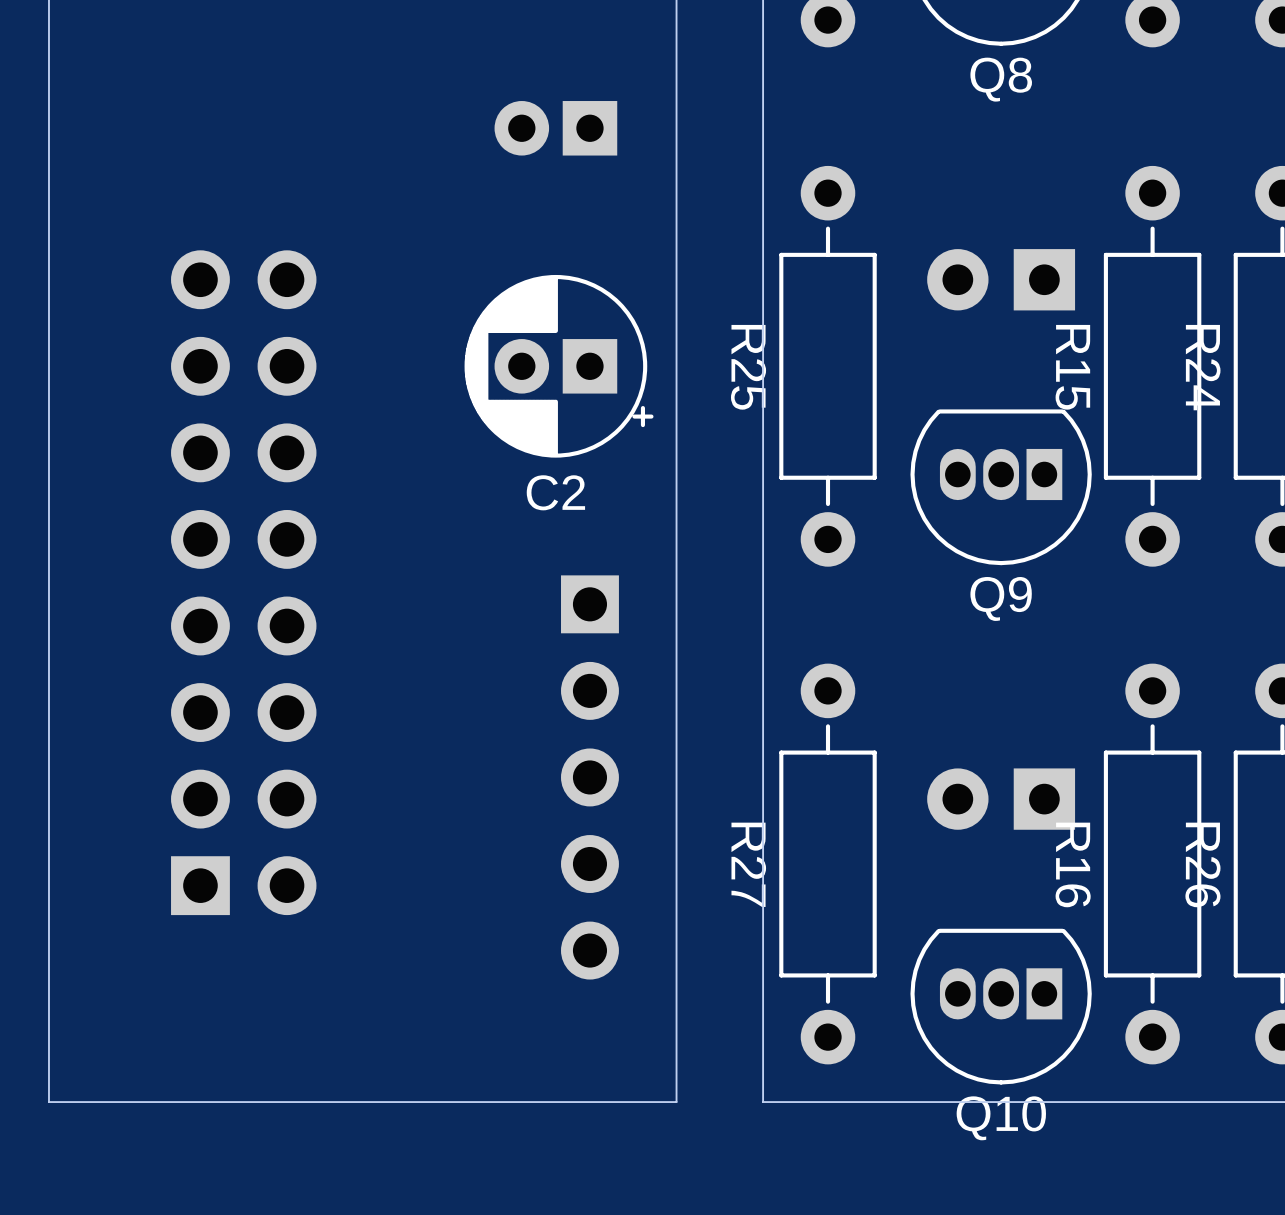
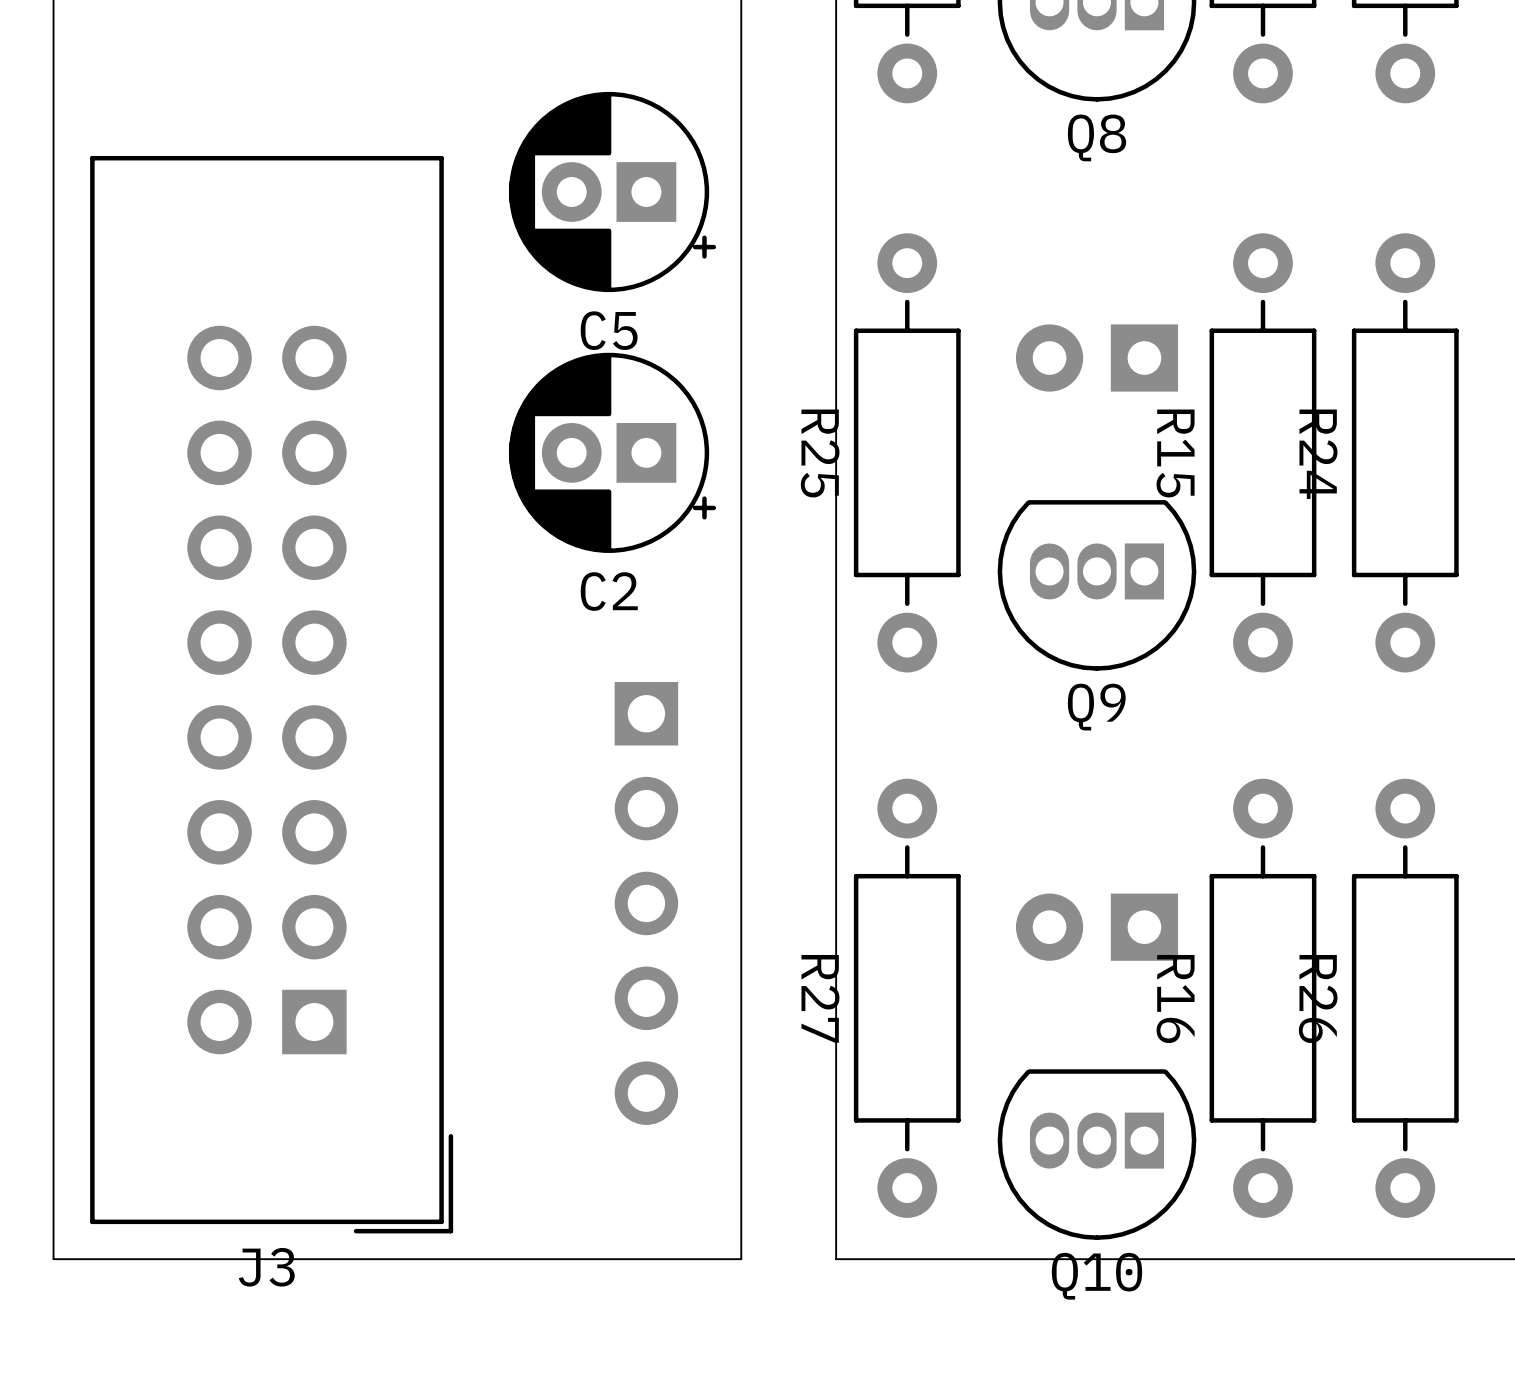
C5 side: top (555, 128) -> bottom (612, 192)
J3 side: top (243, 582) -> bottom (271, 694)

